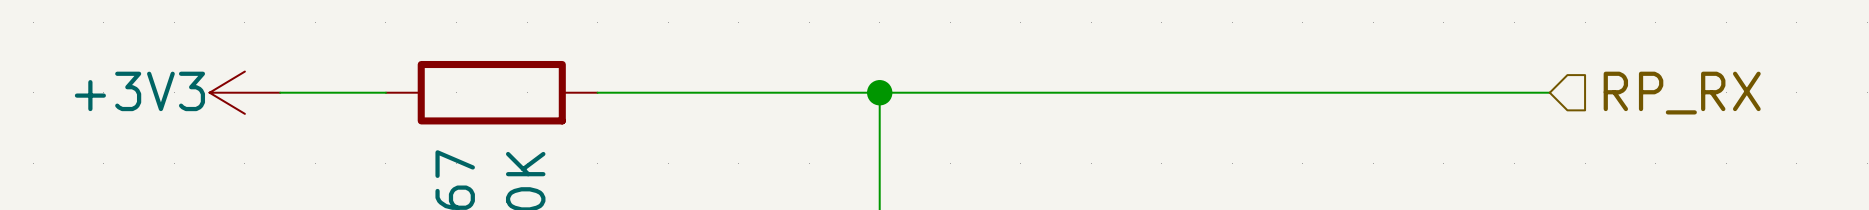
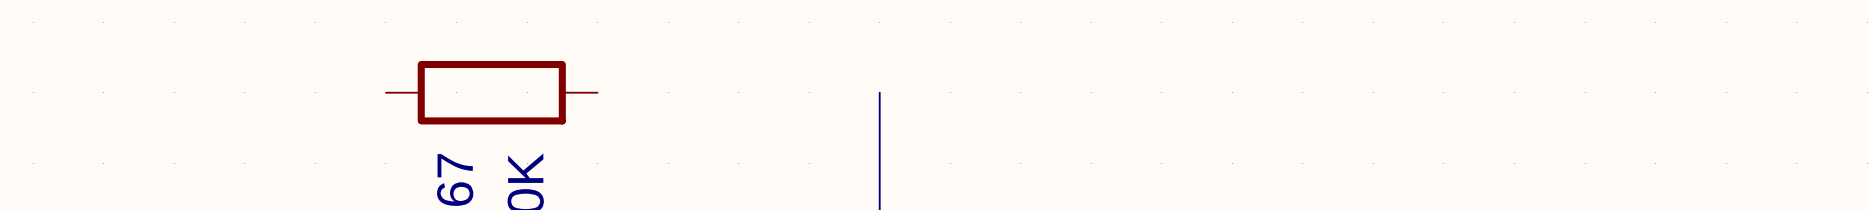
power symbol: +3V3 (244, 92) -> none
wire: (280, 92) (385, 92) -> none
wire: (597, 92) (1549, 92) -> none
junction: (879, 92) -> none
hierarchical label: RP_RX (1682, 93) -> none

